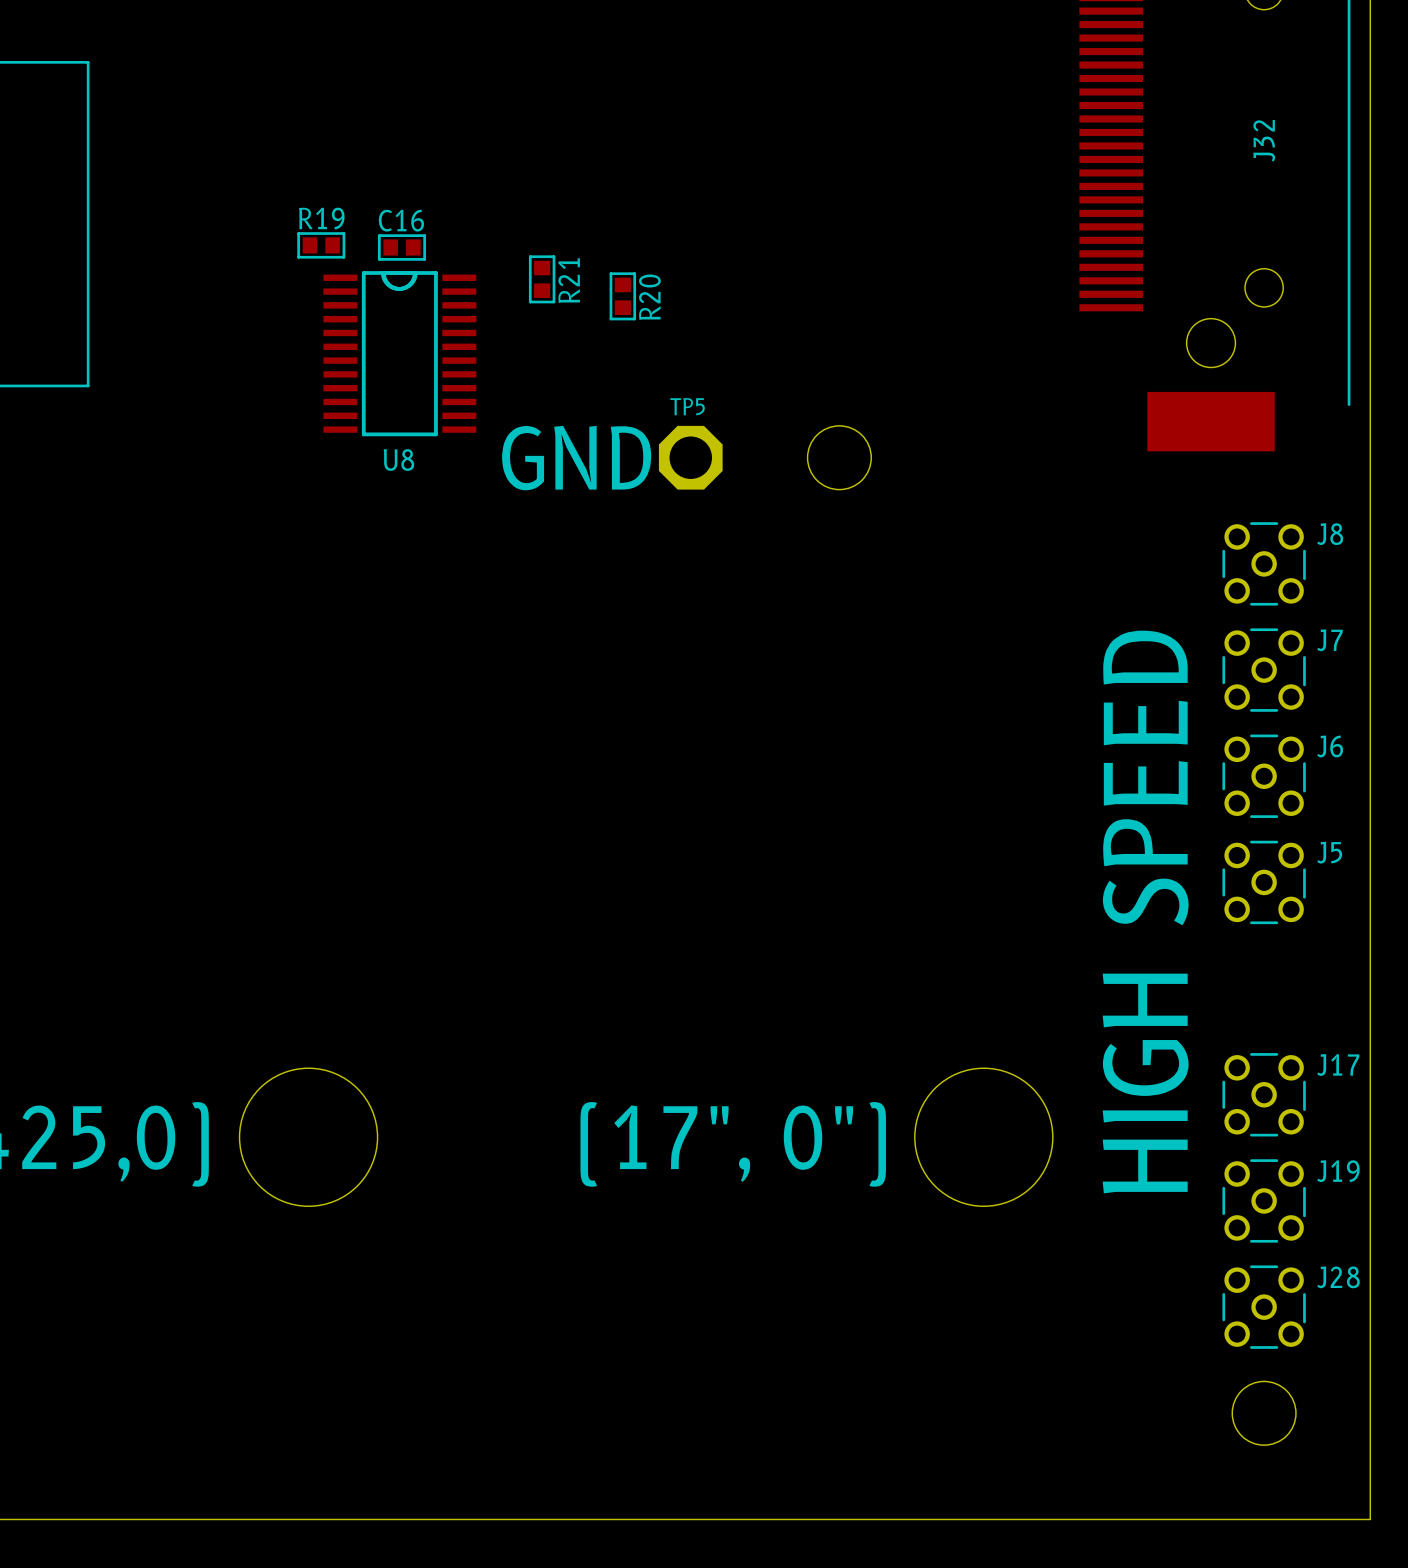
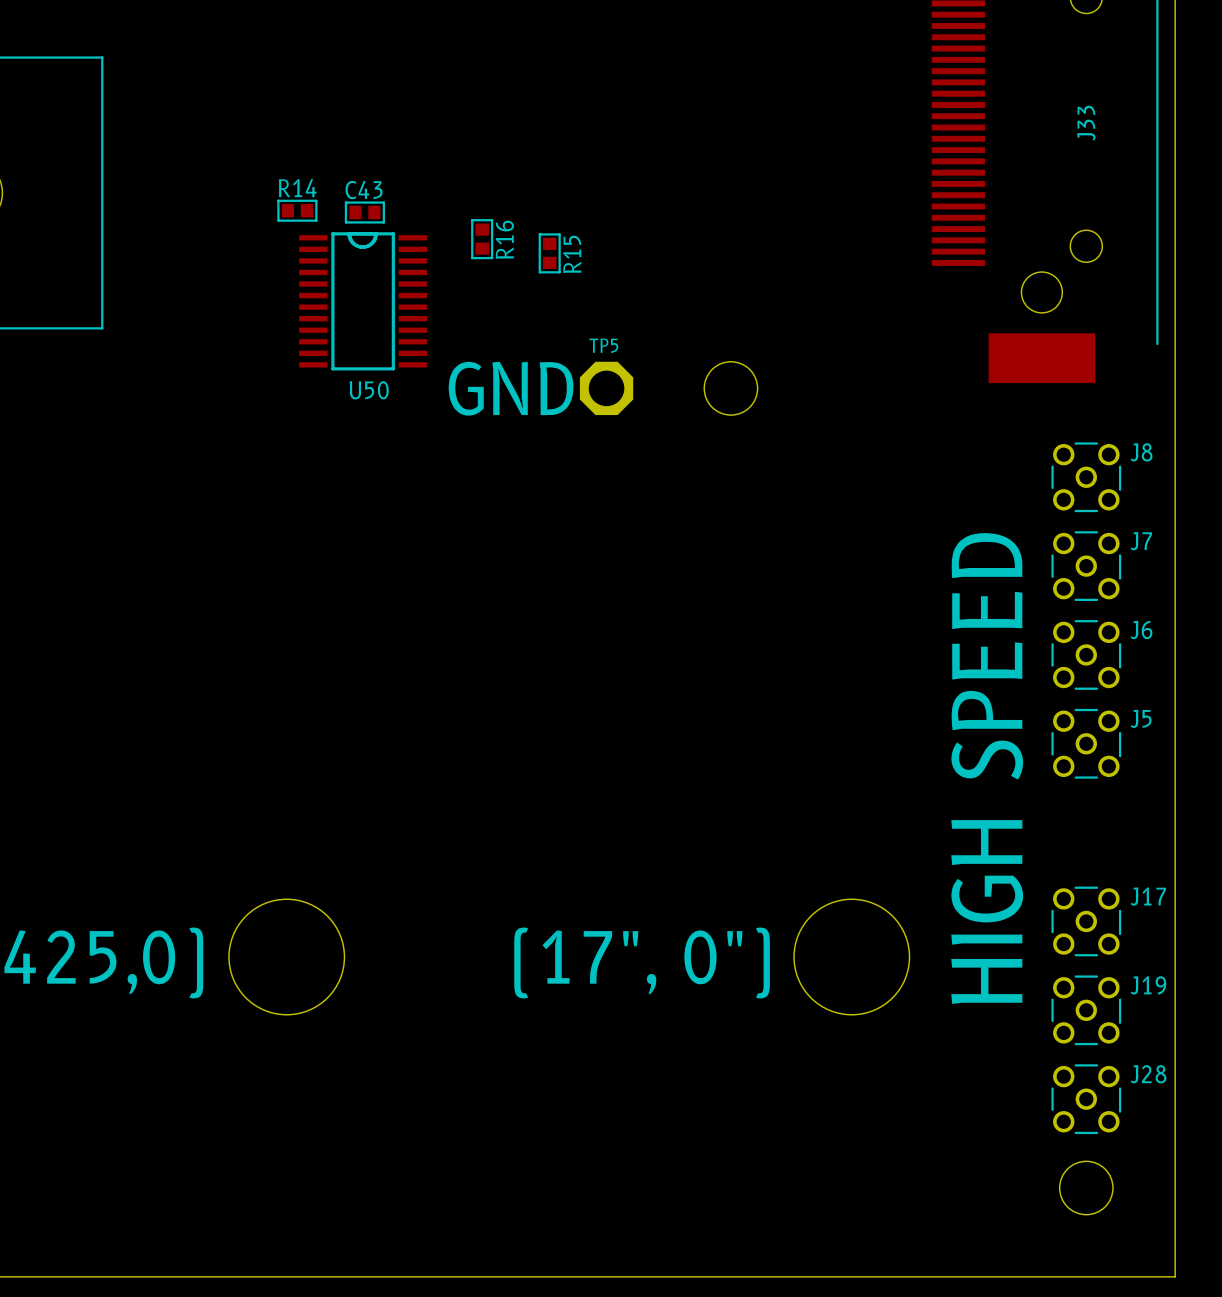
J32 name: J32 (1264, 140) -> J33 (1086, 123)
R19 name: R19 (321, 218) -> R14 (297, 188)
C16 name: C16 (401, 220) -> C43 (364, 190)
R21 name: R21 (569, 280) -> R16 (504, 239)
R20 name: R20 (649, 297) -> R15 (572, 254)
U8 name: U8 (398, 459) -> U50 (369, 390)

